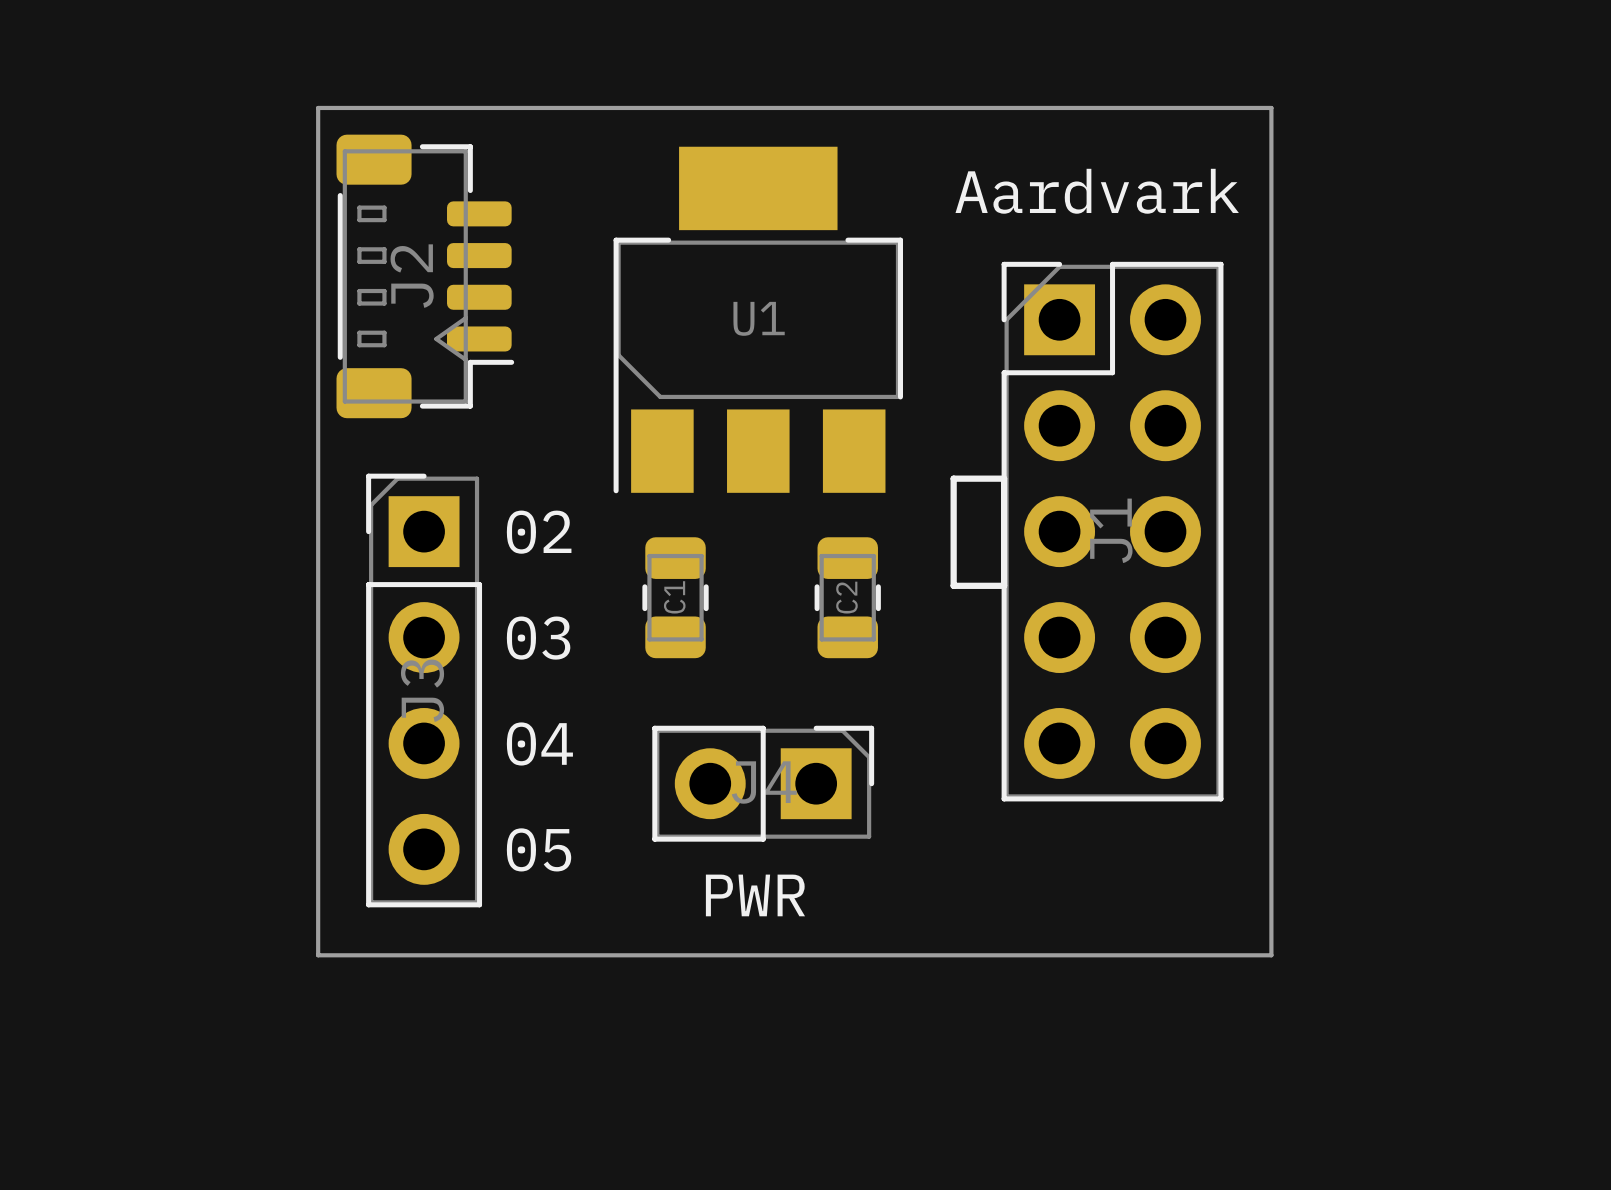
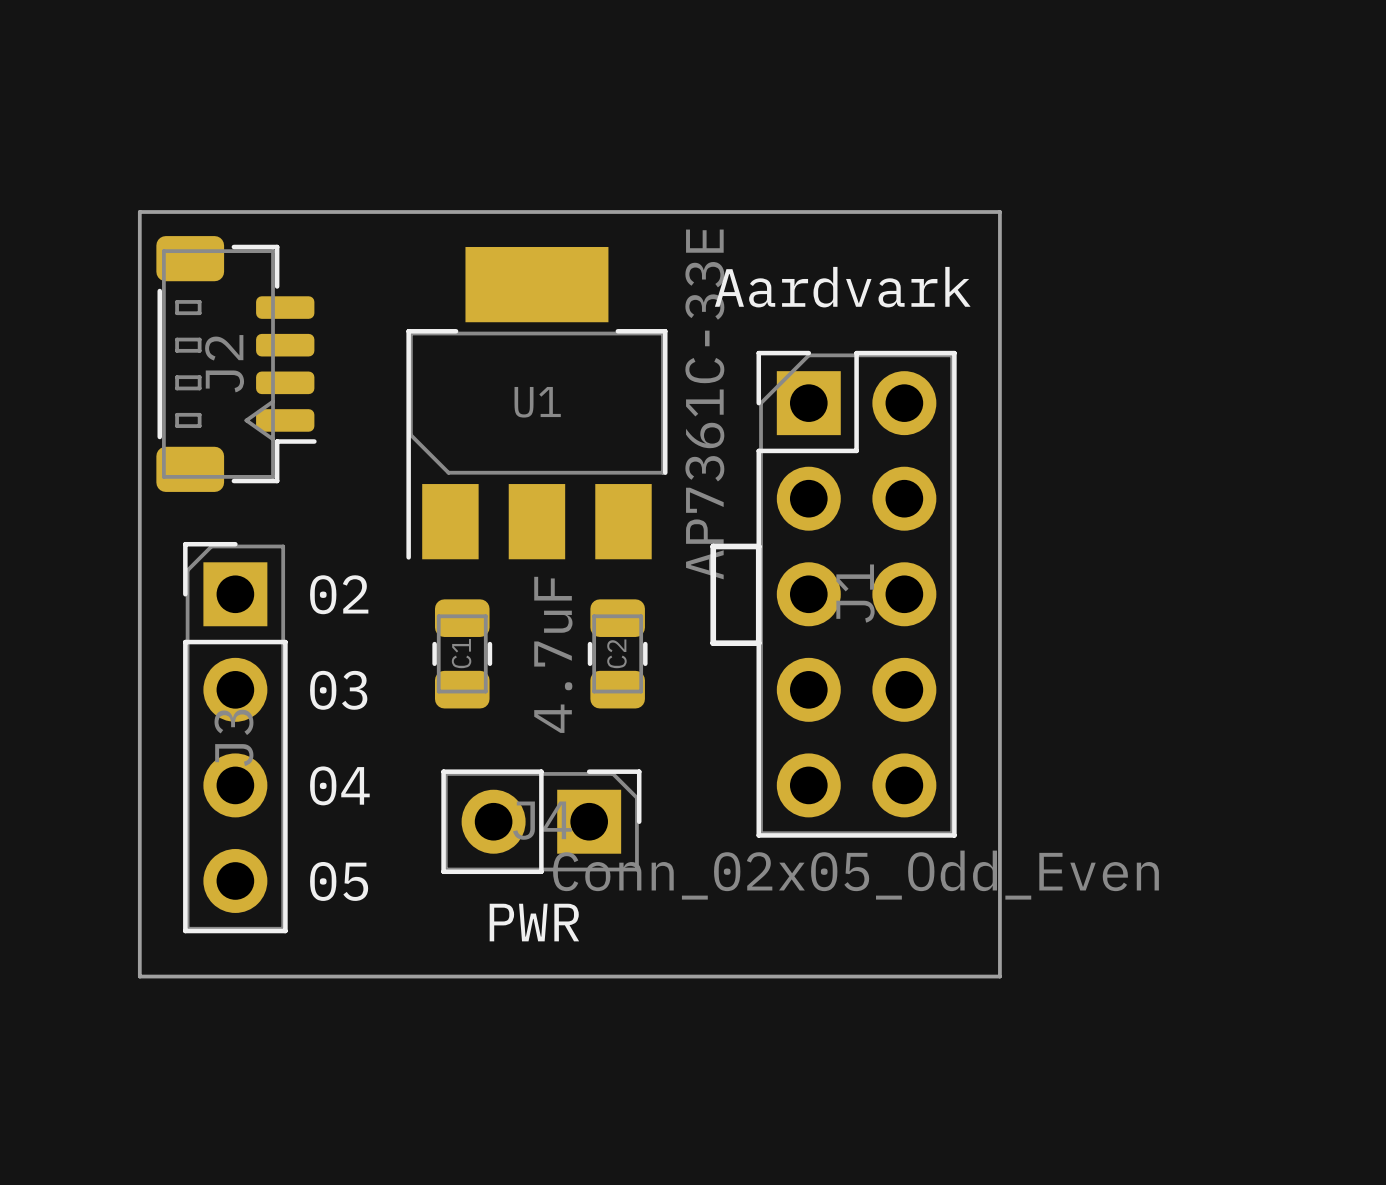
U1 value: none -> AP7361C-33E (704, 404)
C2 value: none -> 4.7uF (553, 654)
J1 value: none -> Conn_02x05_Odd_Even (855, 875)

